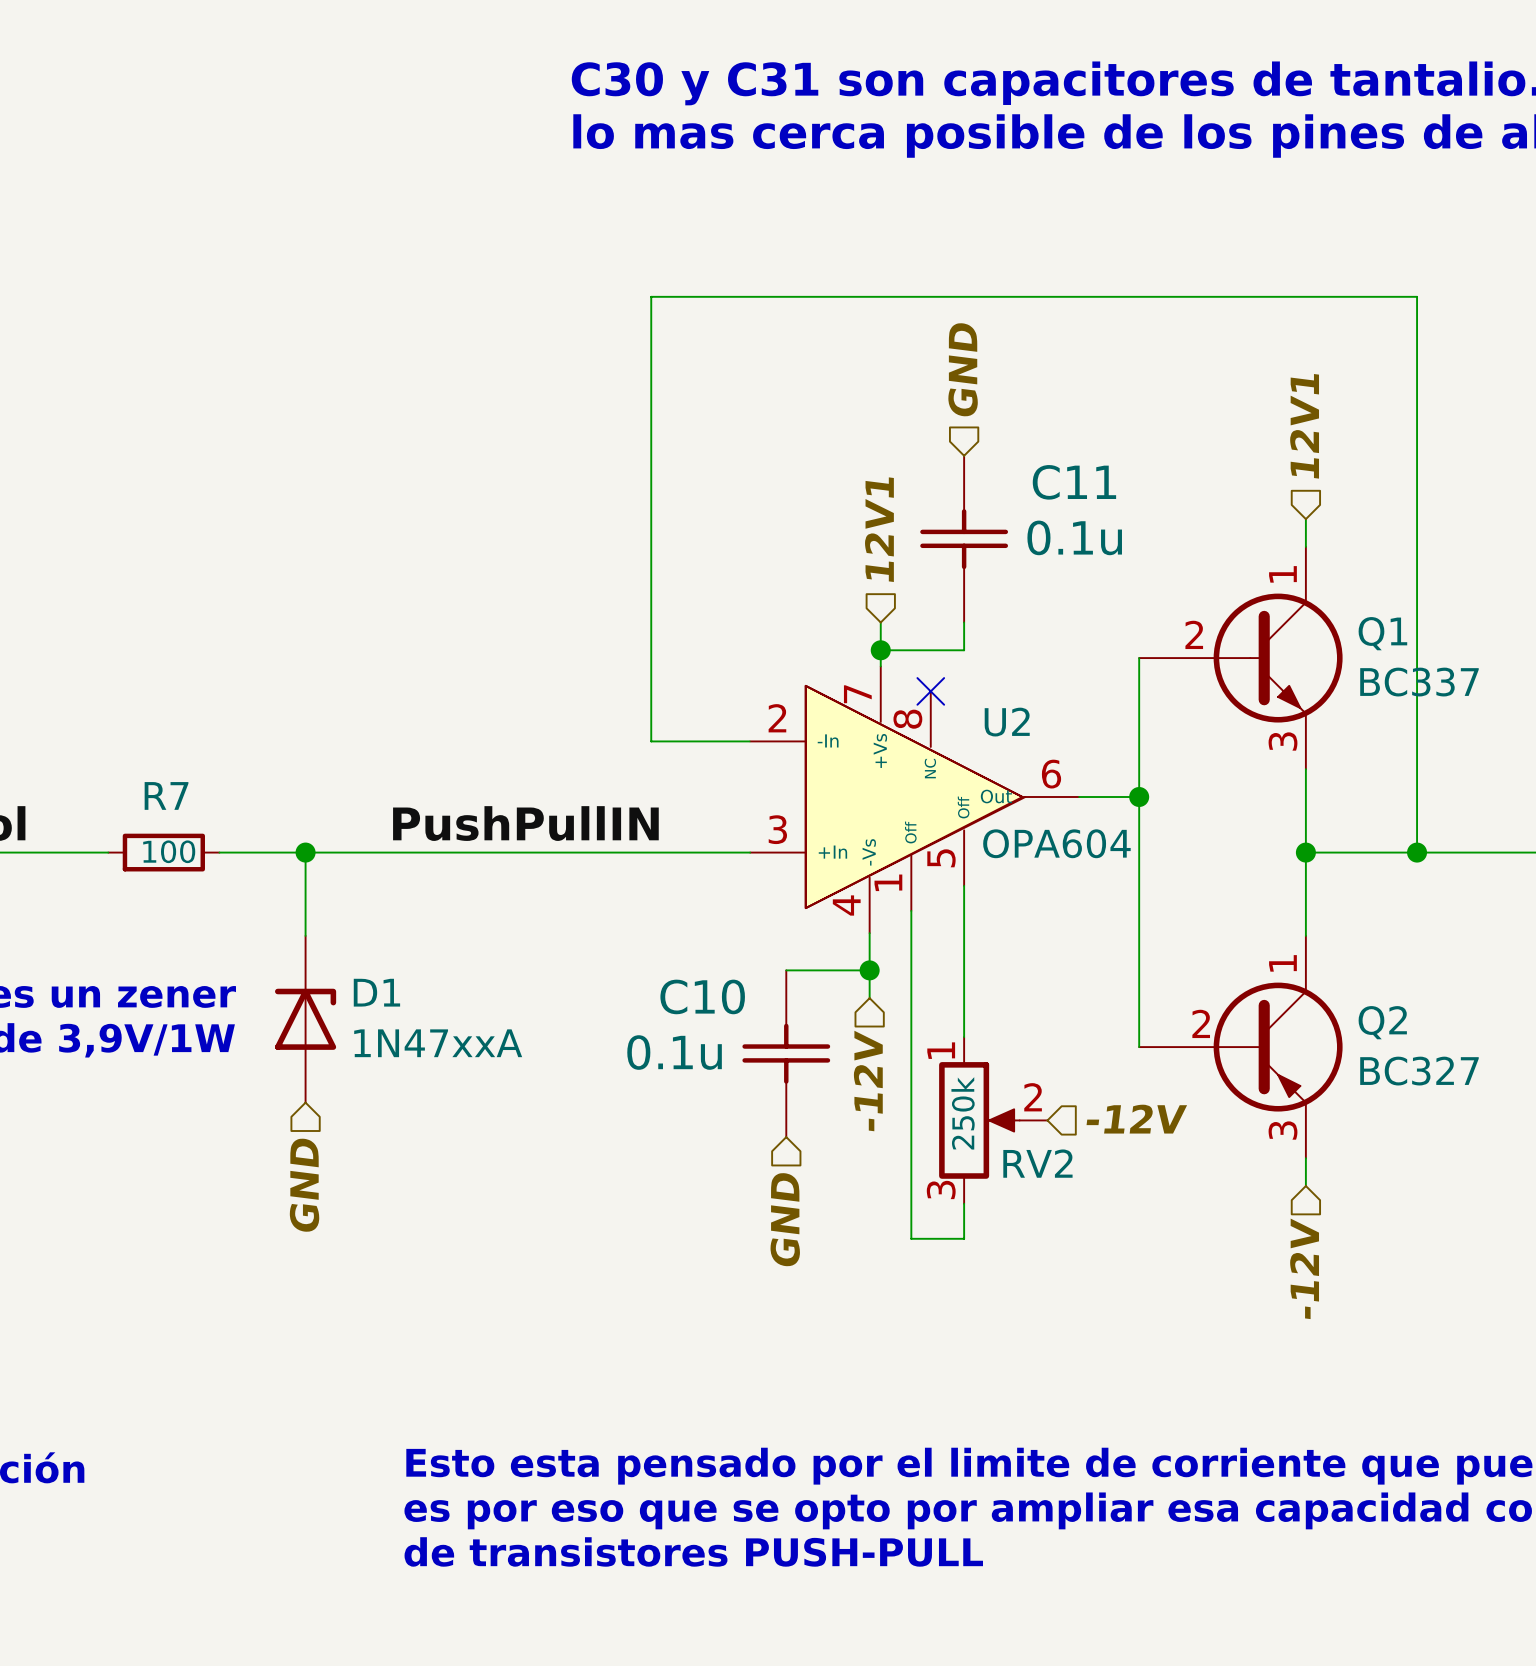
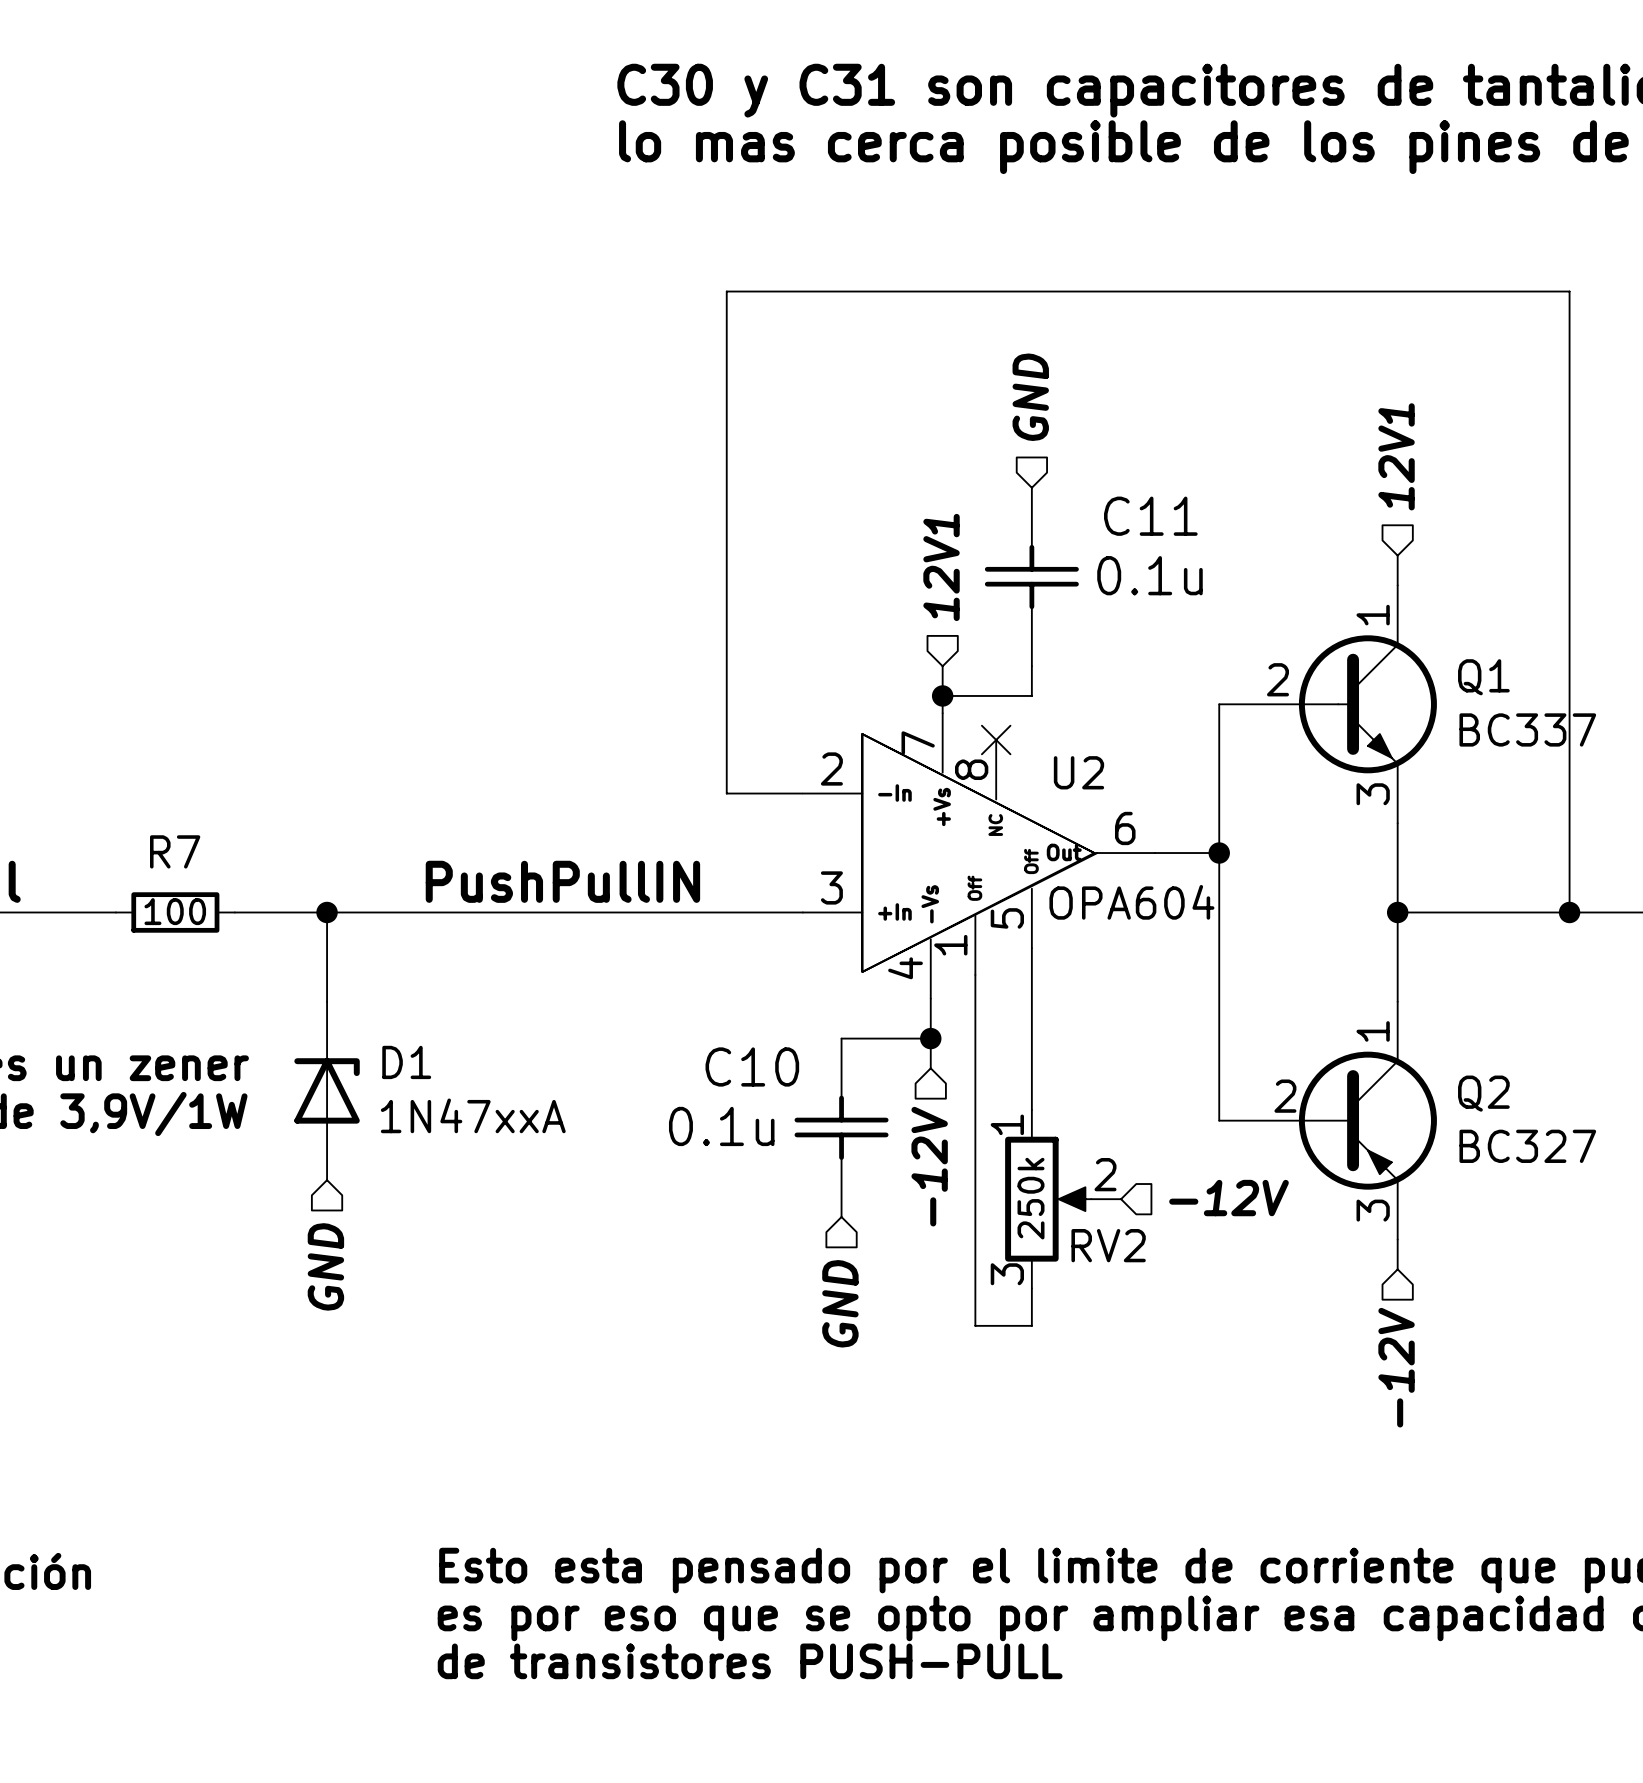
wire: (679, 741) (651, 741) (651, 296) (1417, 296) (1417, 852) -> (726, 793) (726, 291) (1569, 291) (1569, 912)
junction position: (1417, 852) -> (1569, 912)

